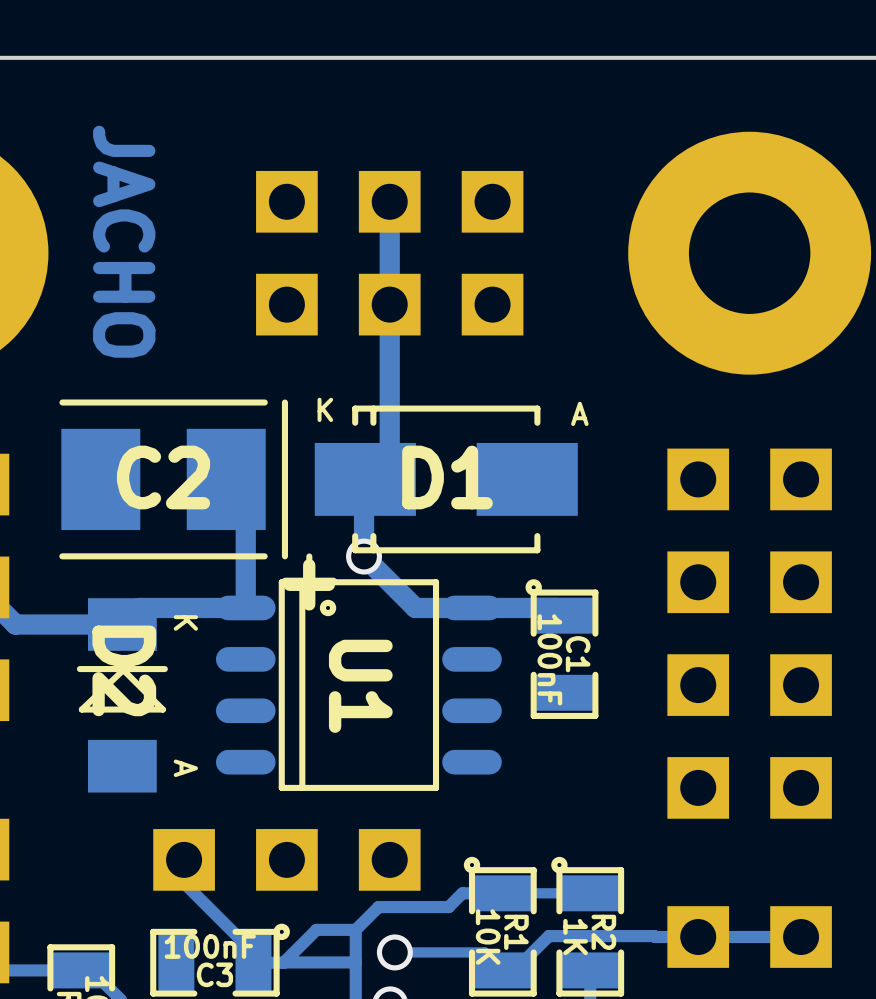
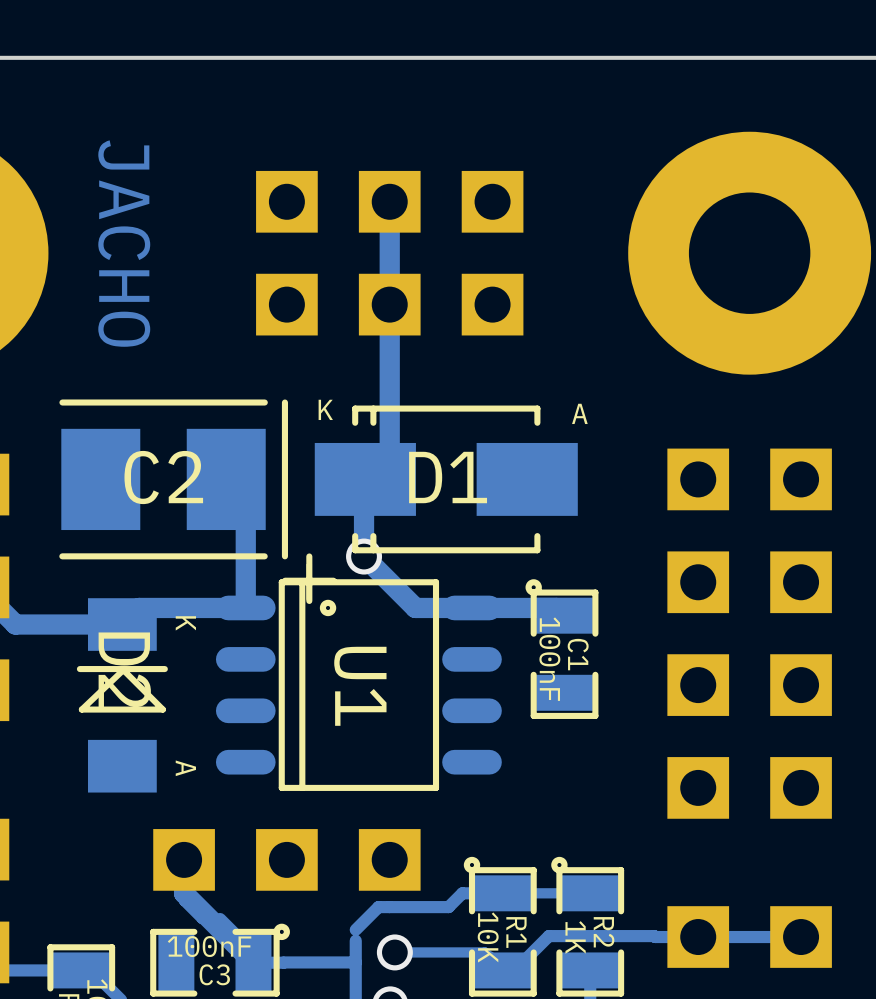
track: (184, 883) (220, 919) -> (253, 962) (184, 893) (184, 883) (184, 901) (202, 919) (220, 919)
track: (355, 940) (355, 929) (316, 929) (283, 962) -> none

